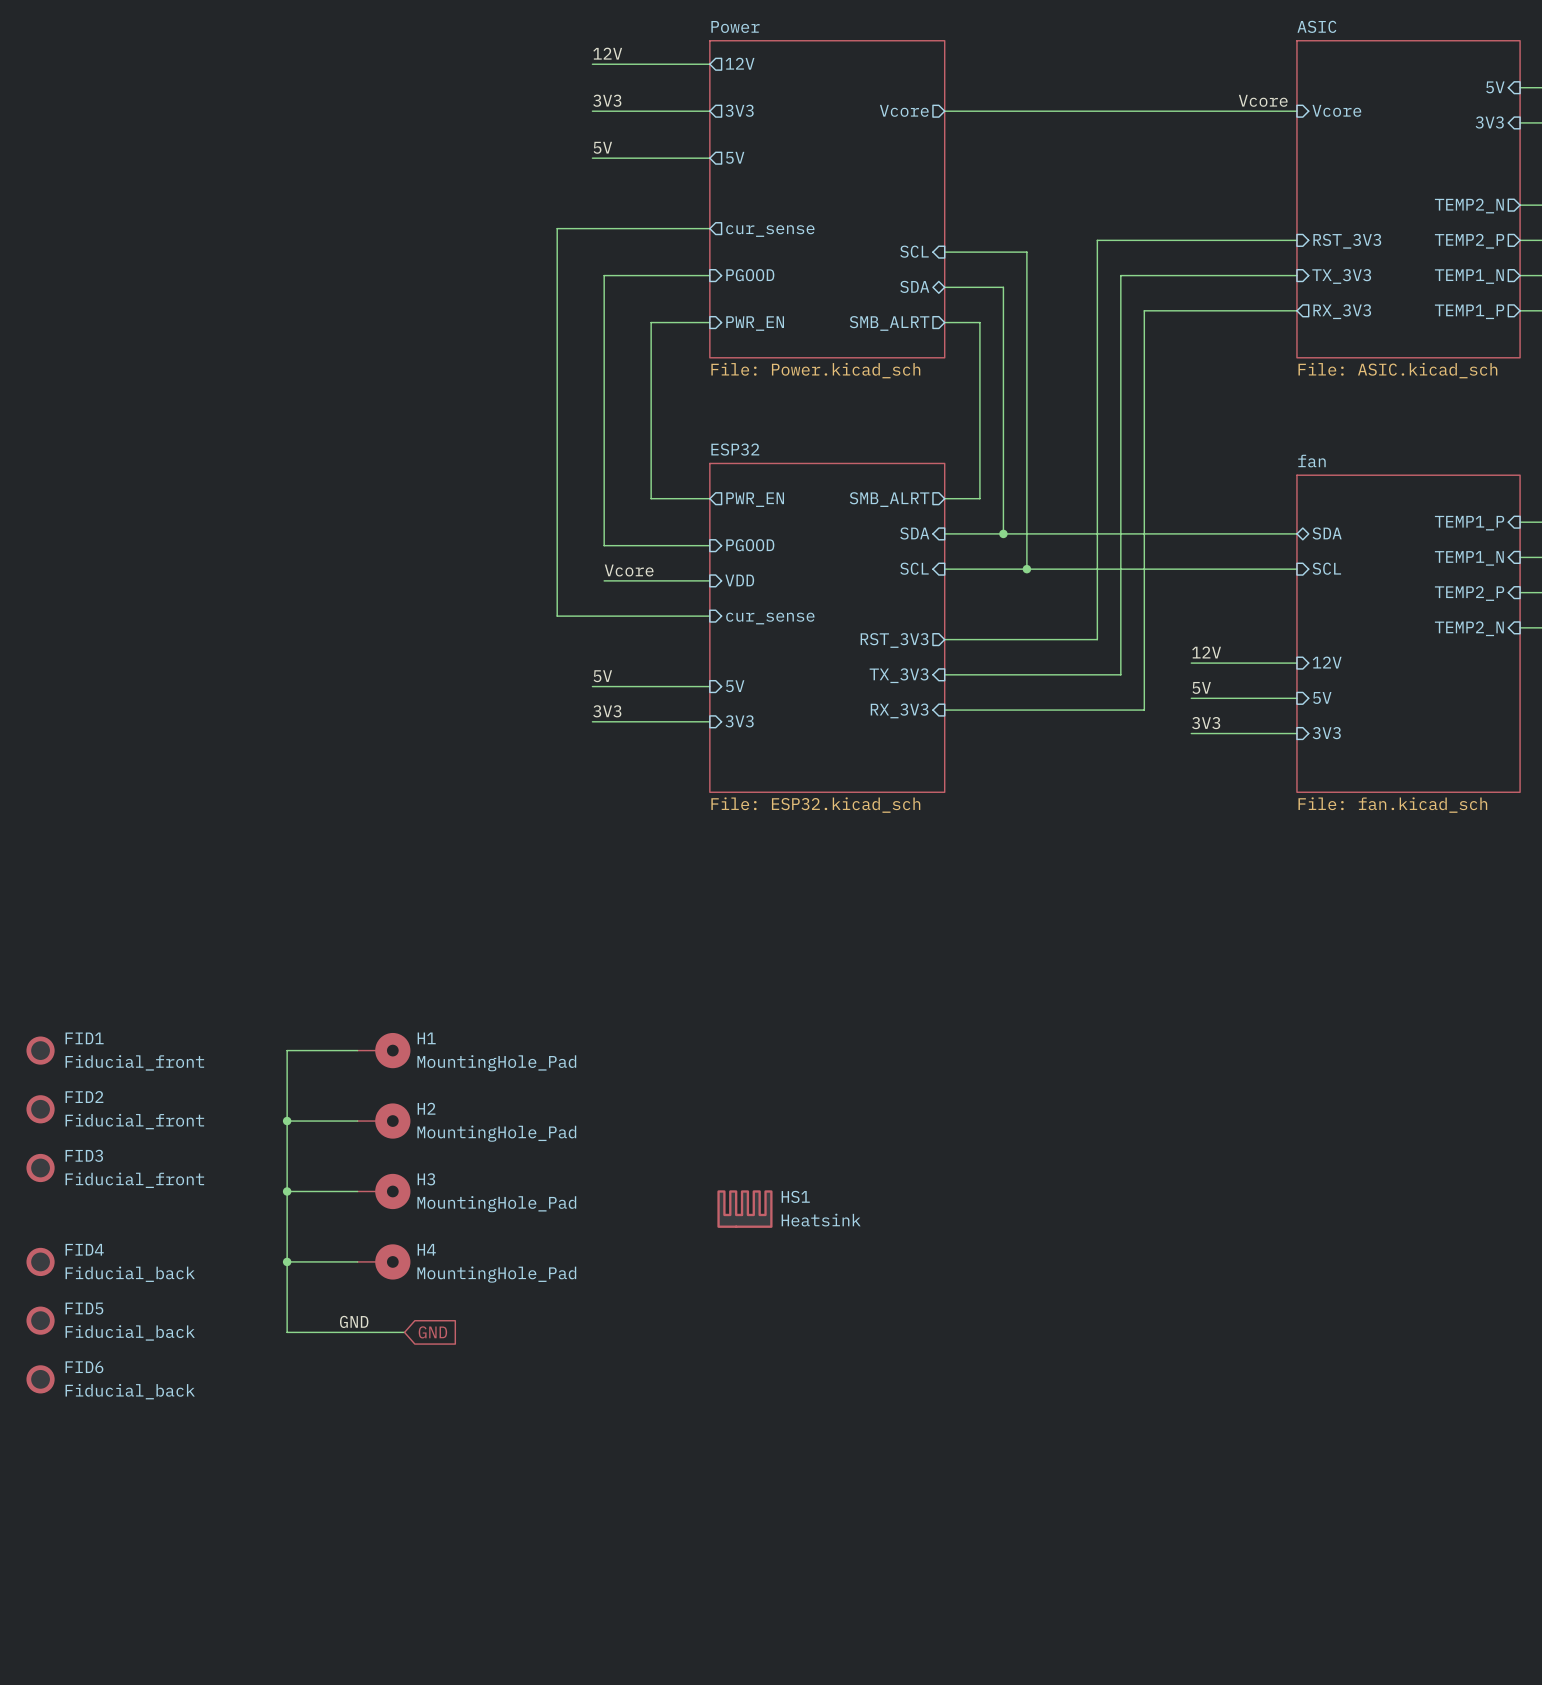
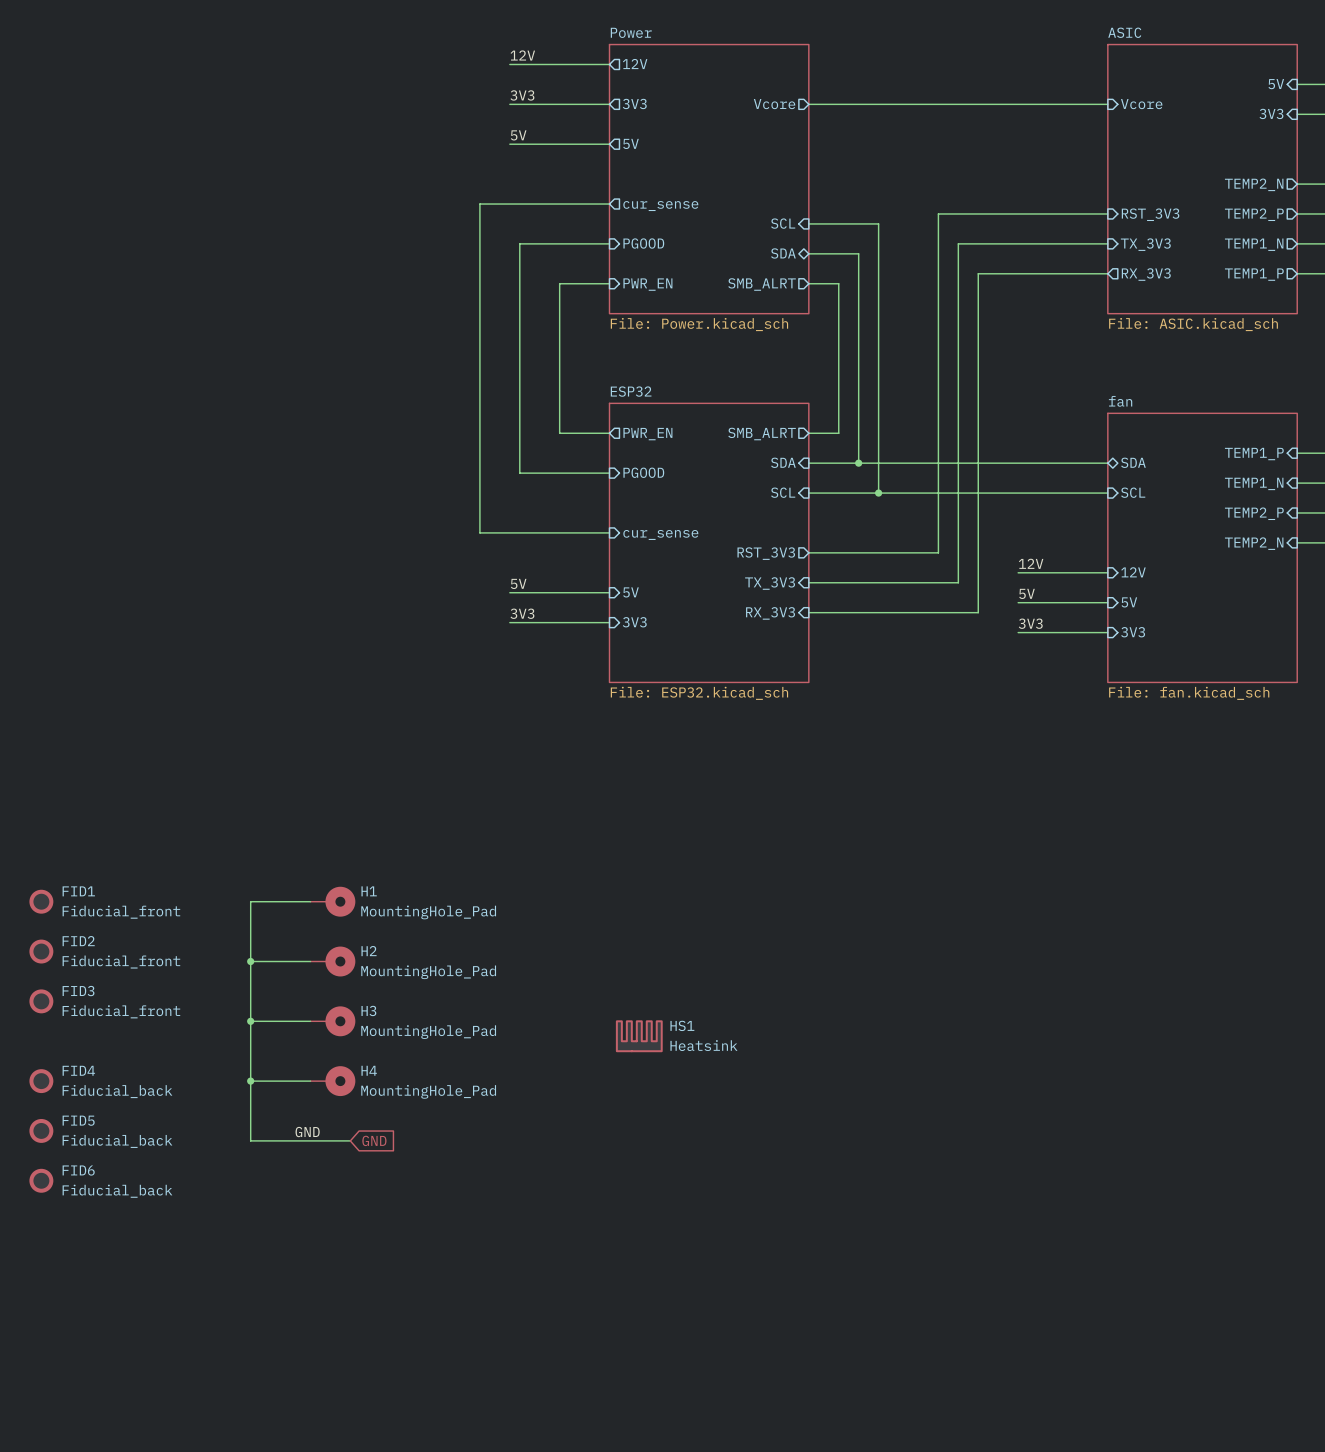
label: Vcore (1263, 100) -> none
label: Vcore (629, 570) -> none
wire: (604, 580) (709, 580) -> none
sheet pin: VDD (739, 580) -> none

